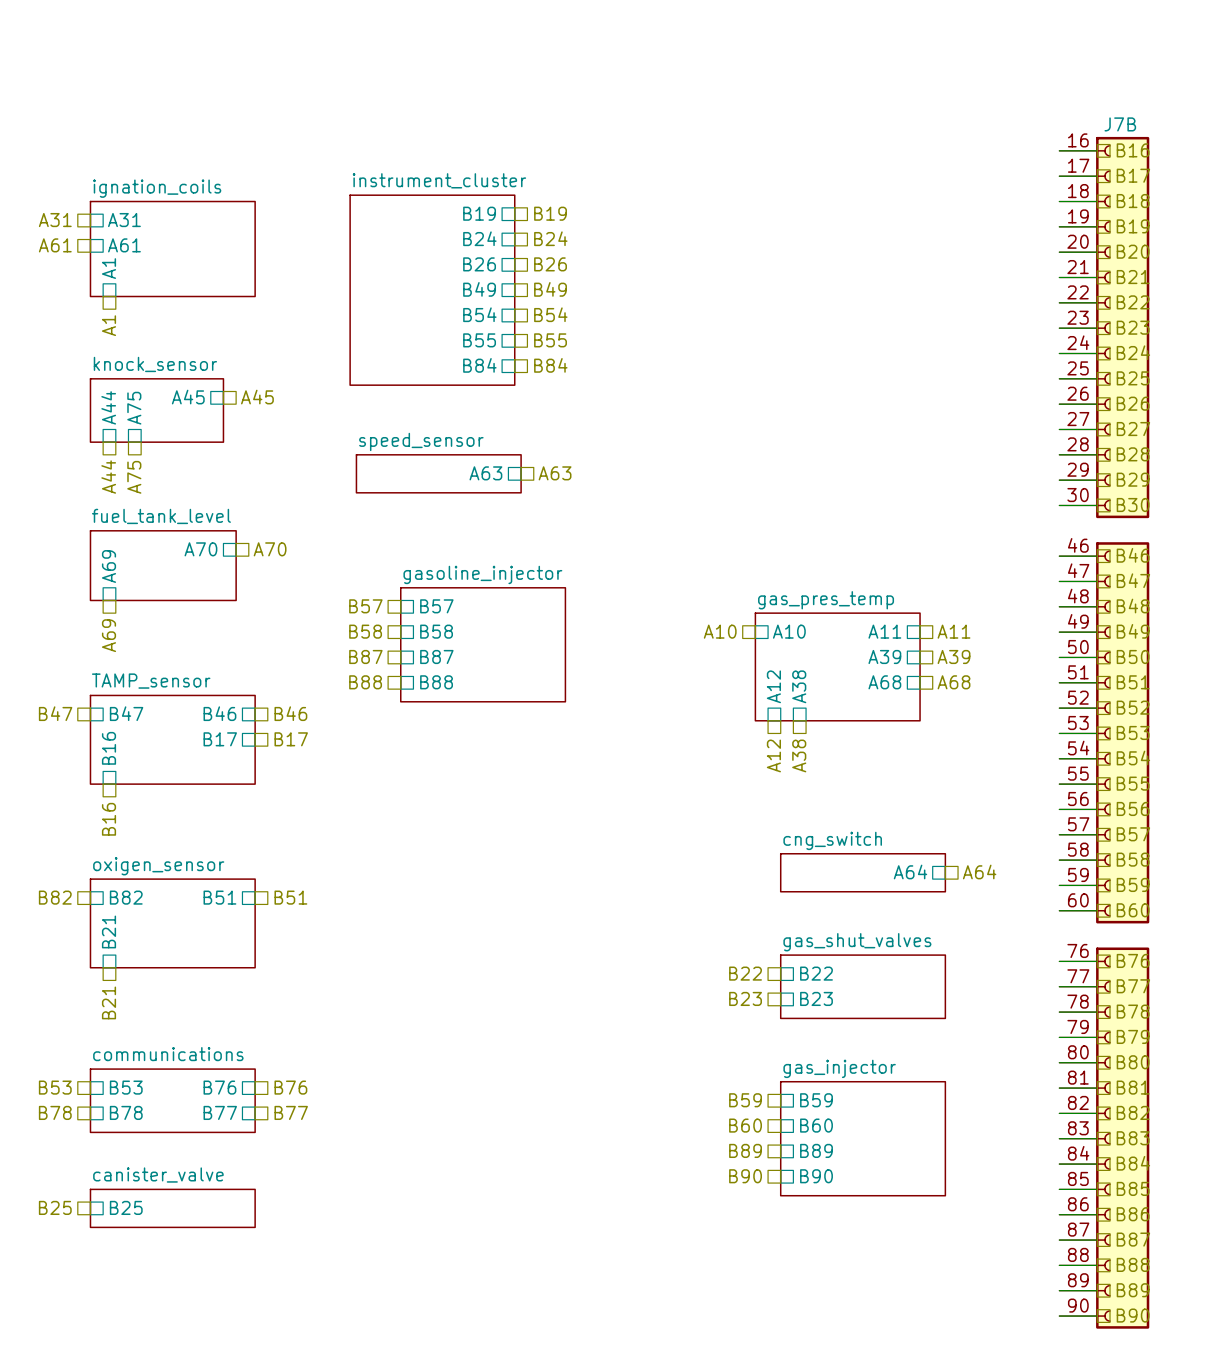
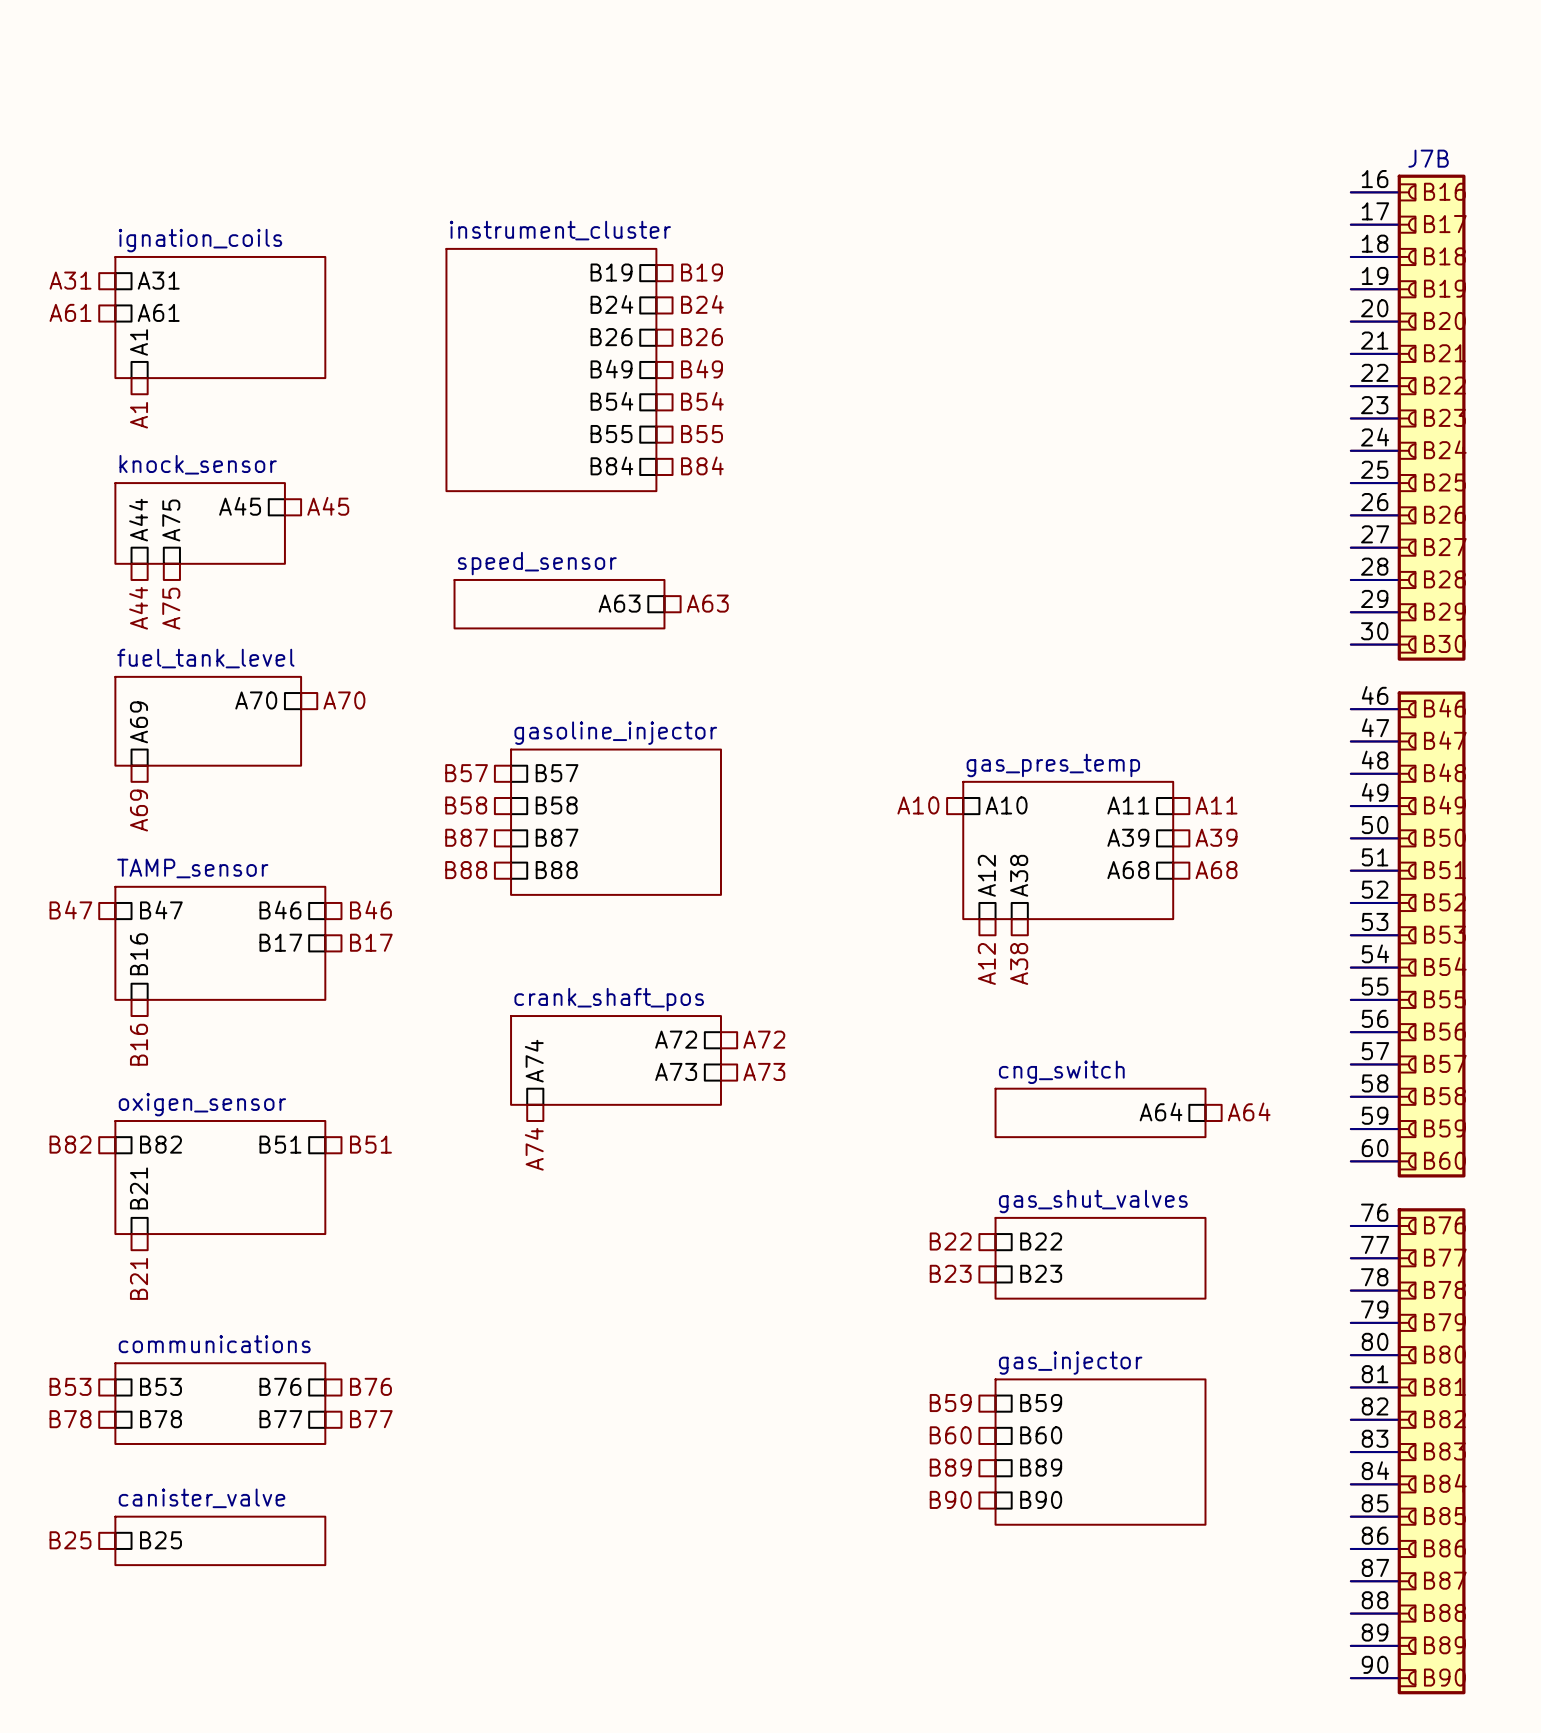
sheet pin: none -> A72 (676, 1039)
hierarchical label: none -> A72 (764, 1039)
sheet crank_shaft_pos: none -> (616, 1060)
sheet pin: none -> A74 (534, 1061)
sheet pin: none -> A73 (676, 1071)
hierarchical label: none -> A73 (764, 1071)
hierarchical label: none -> A74 (534, 1149)

